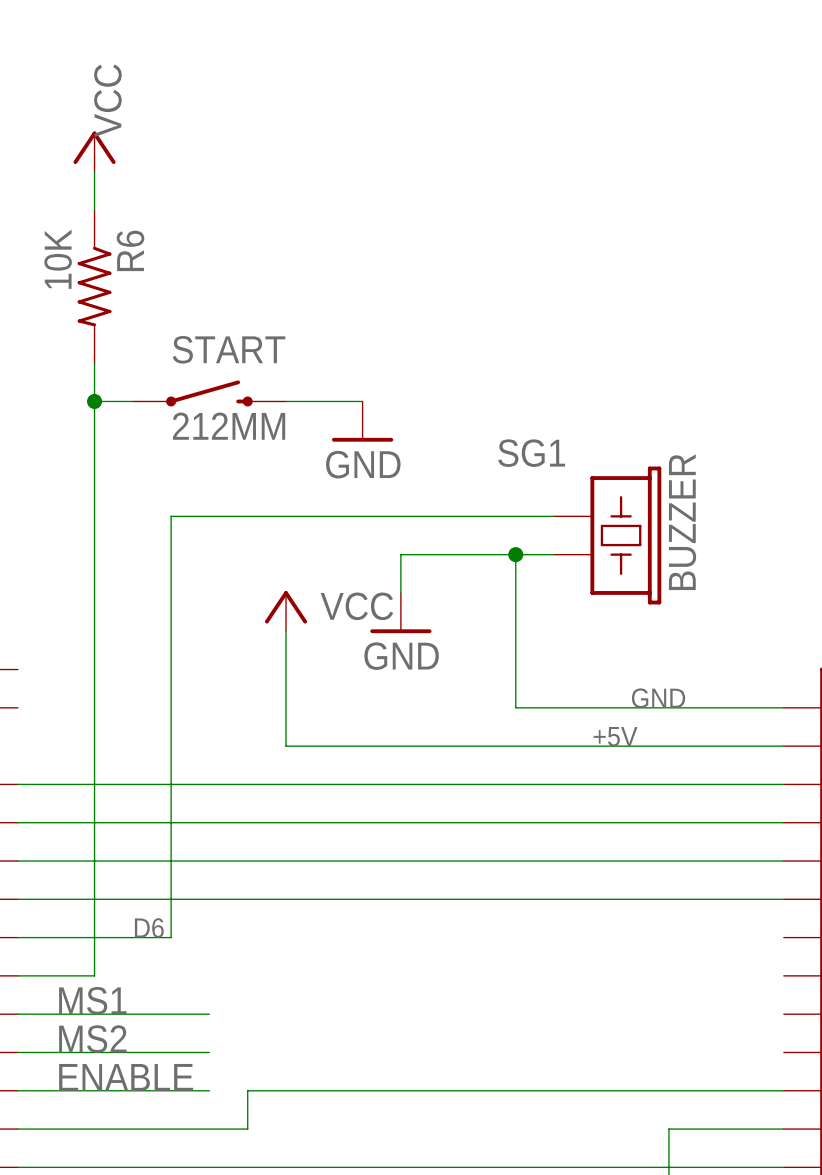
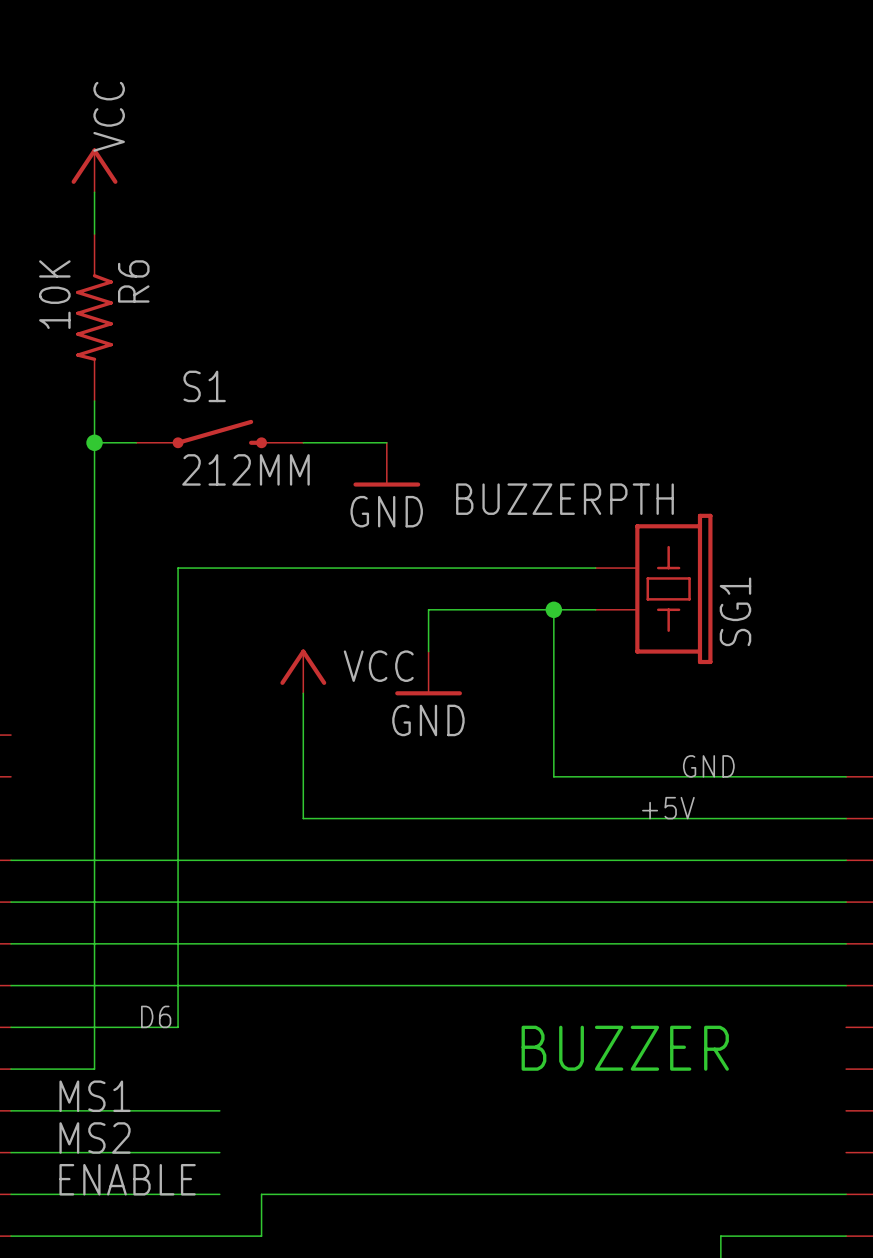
START name: START (228, 349) -> S1 (204, 386)
BUZZER value: SG1 (531, 453) -> BUZZERPTH (564, 499)
BUZZER name: BUZZER (682, 522) -> SG1 (735, 611)
text: none -> BUZZER (625, 1048)

